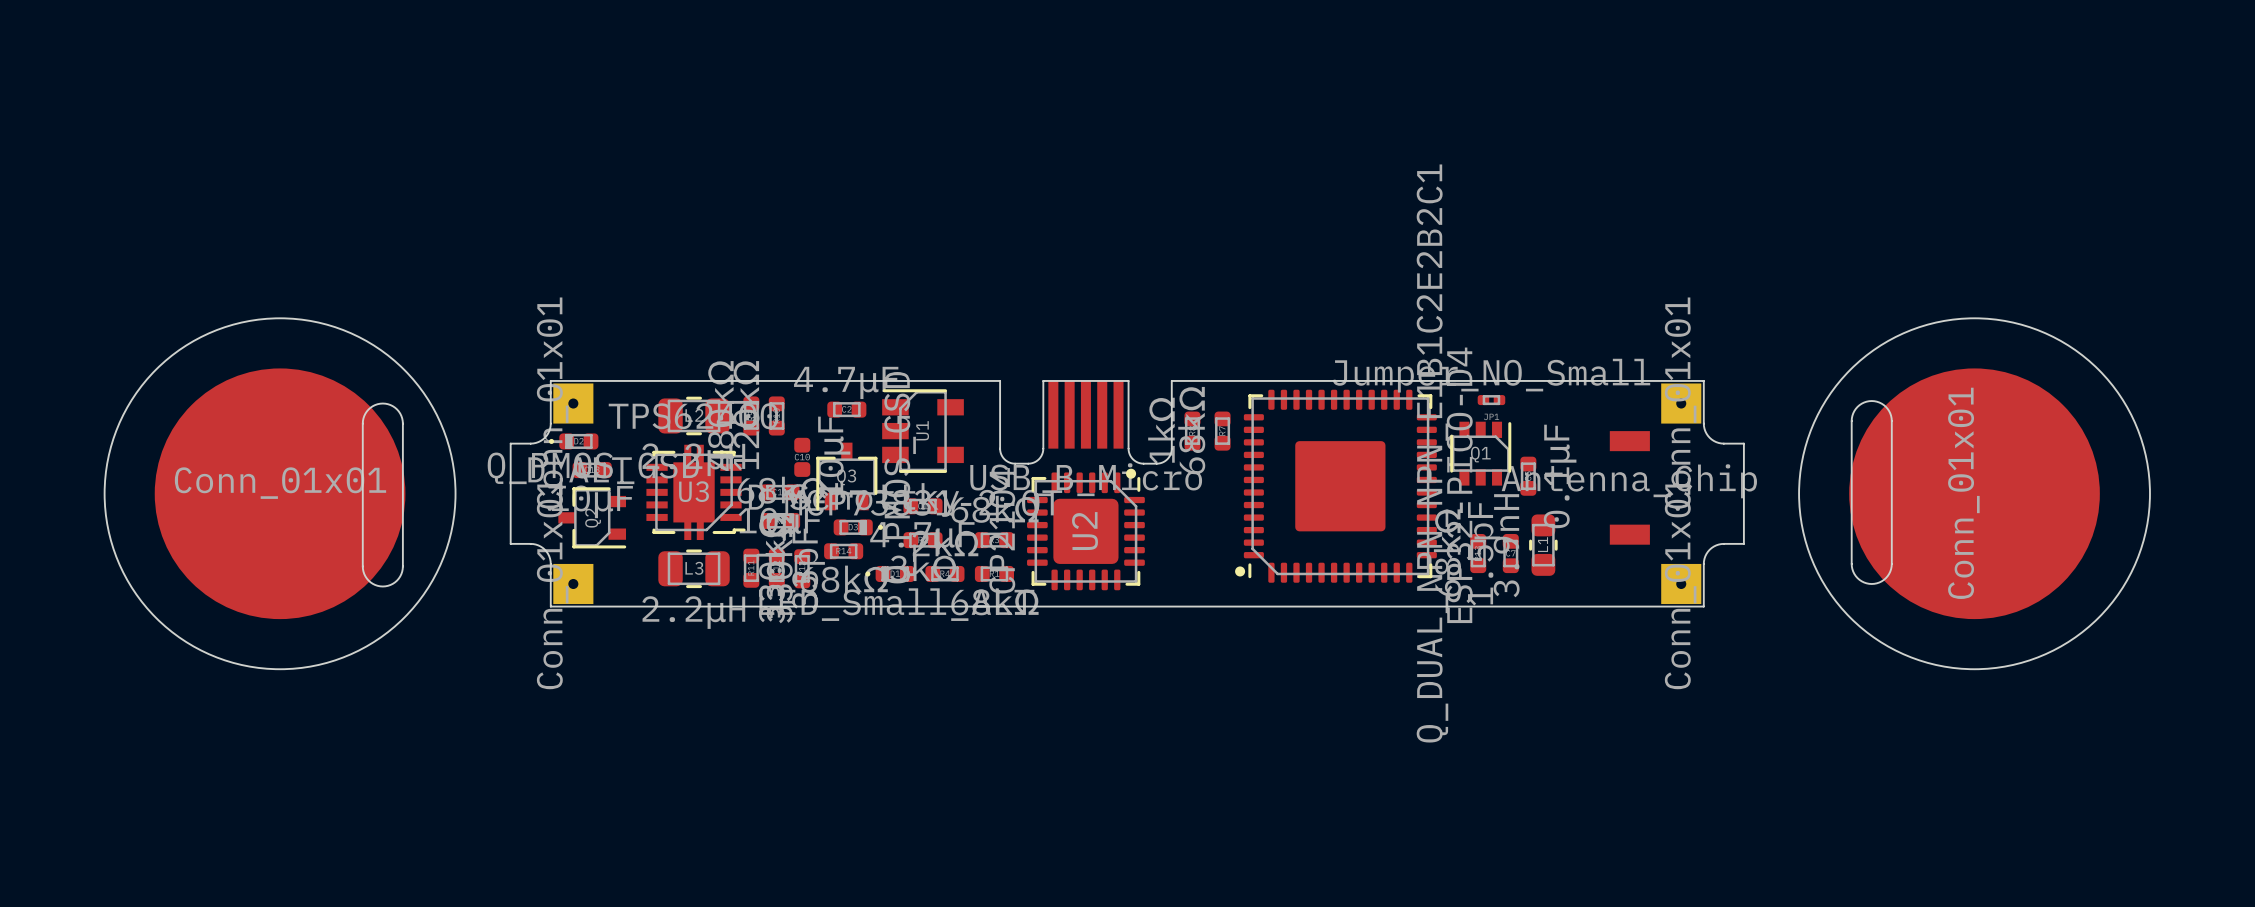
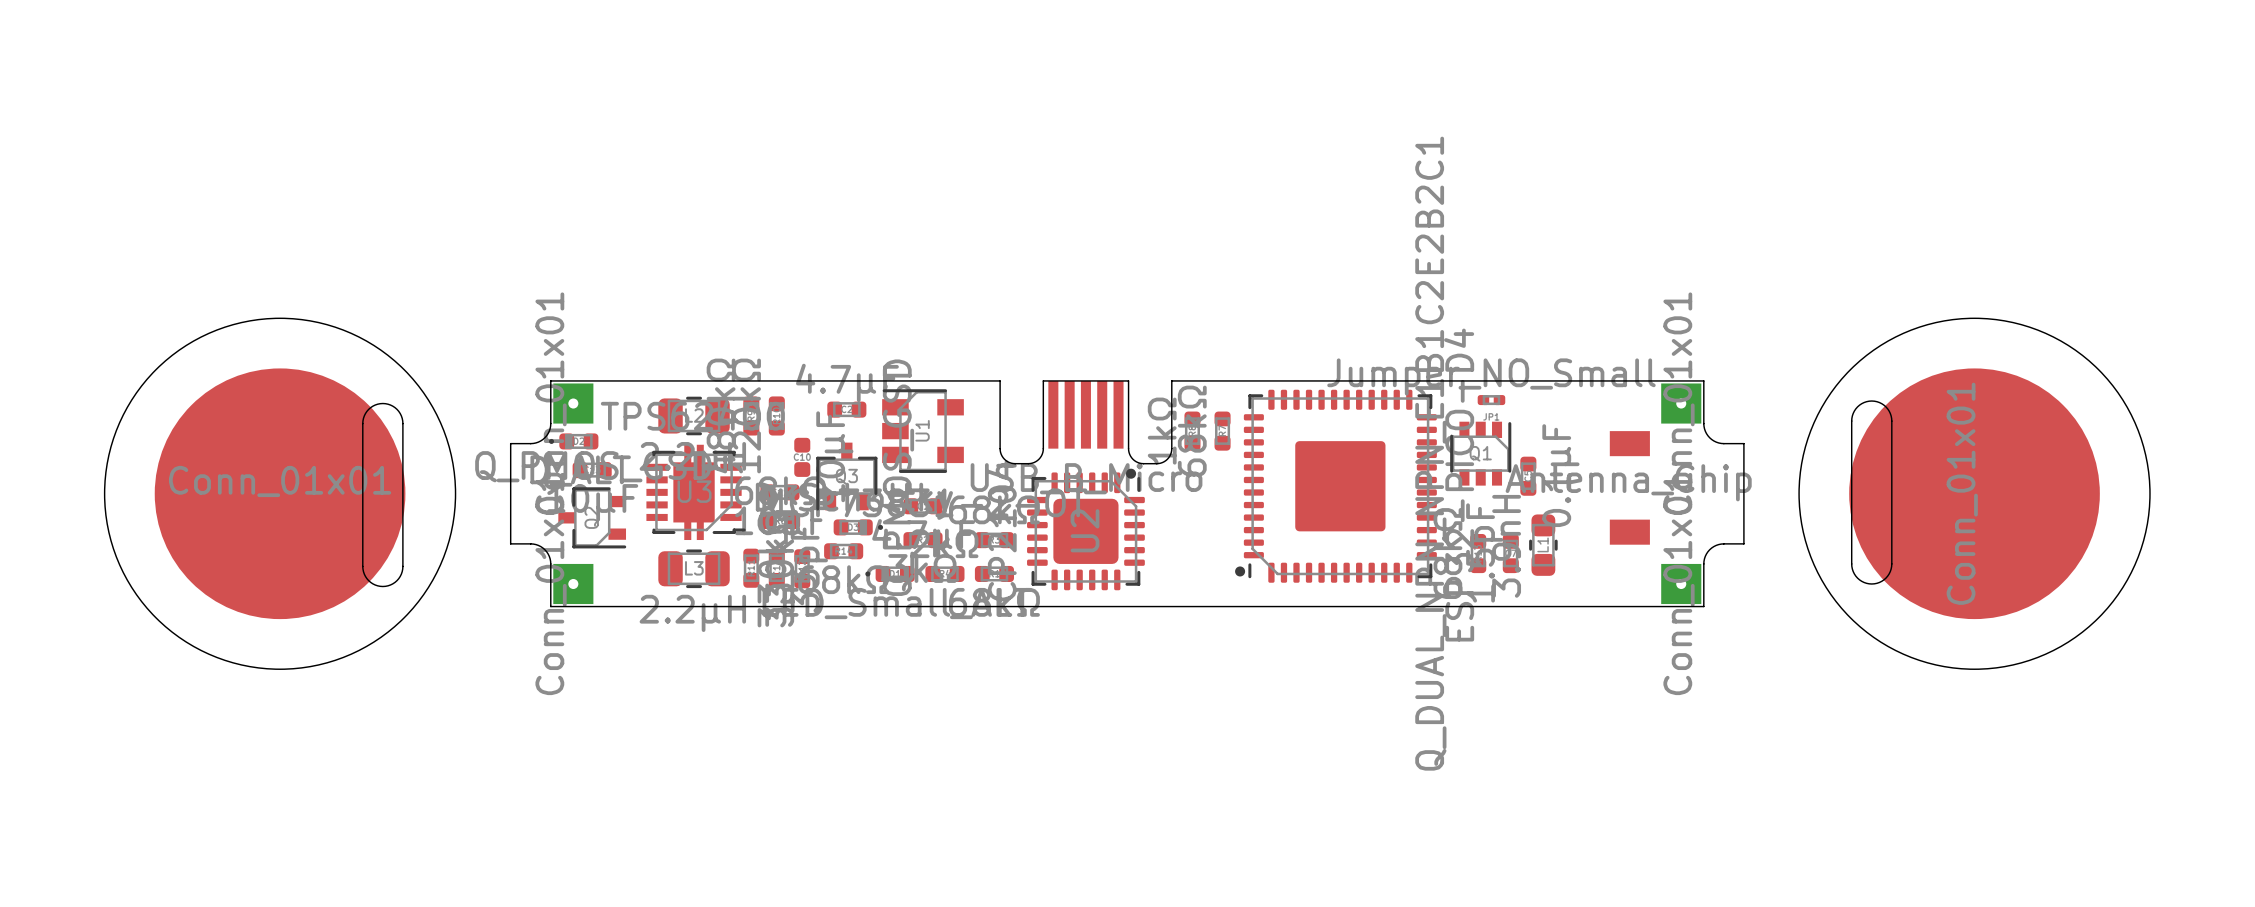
part footprint: [1609, 431, 1650, 545] -> [1609, 431, 1650, 545]

